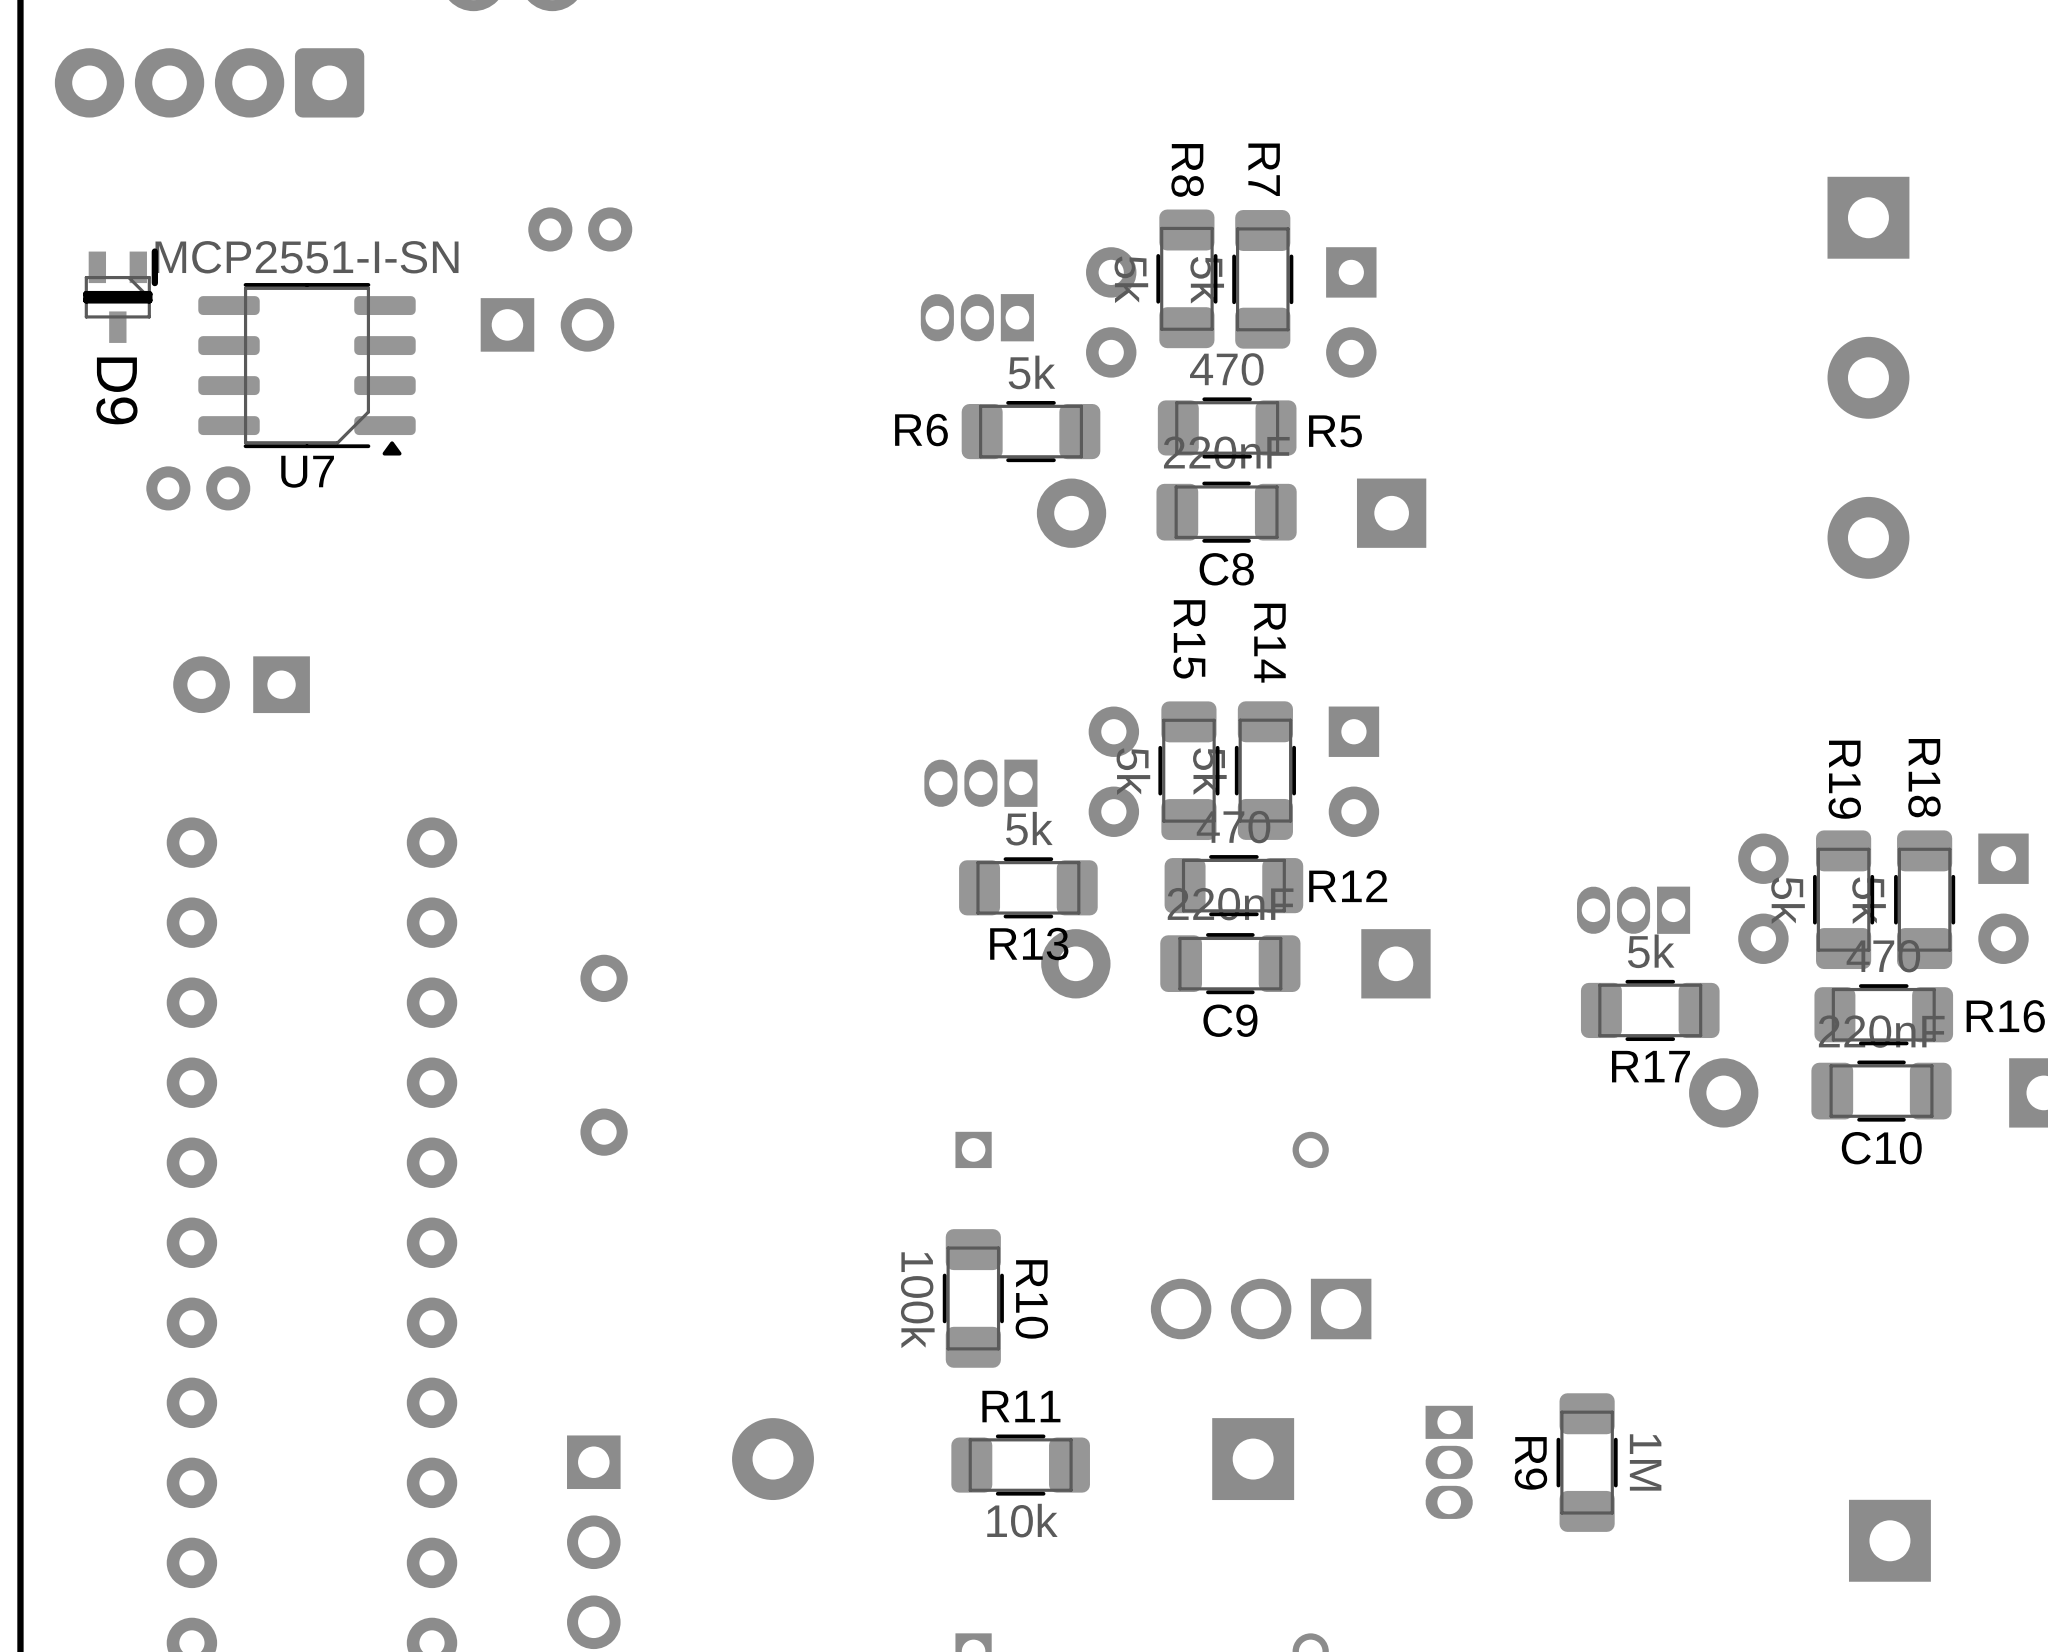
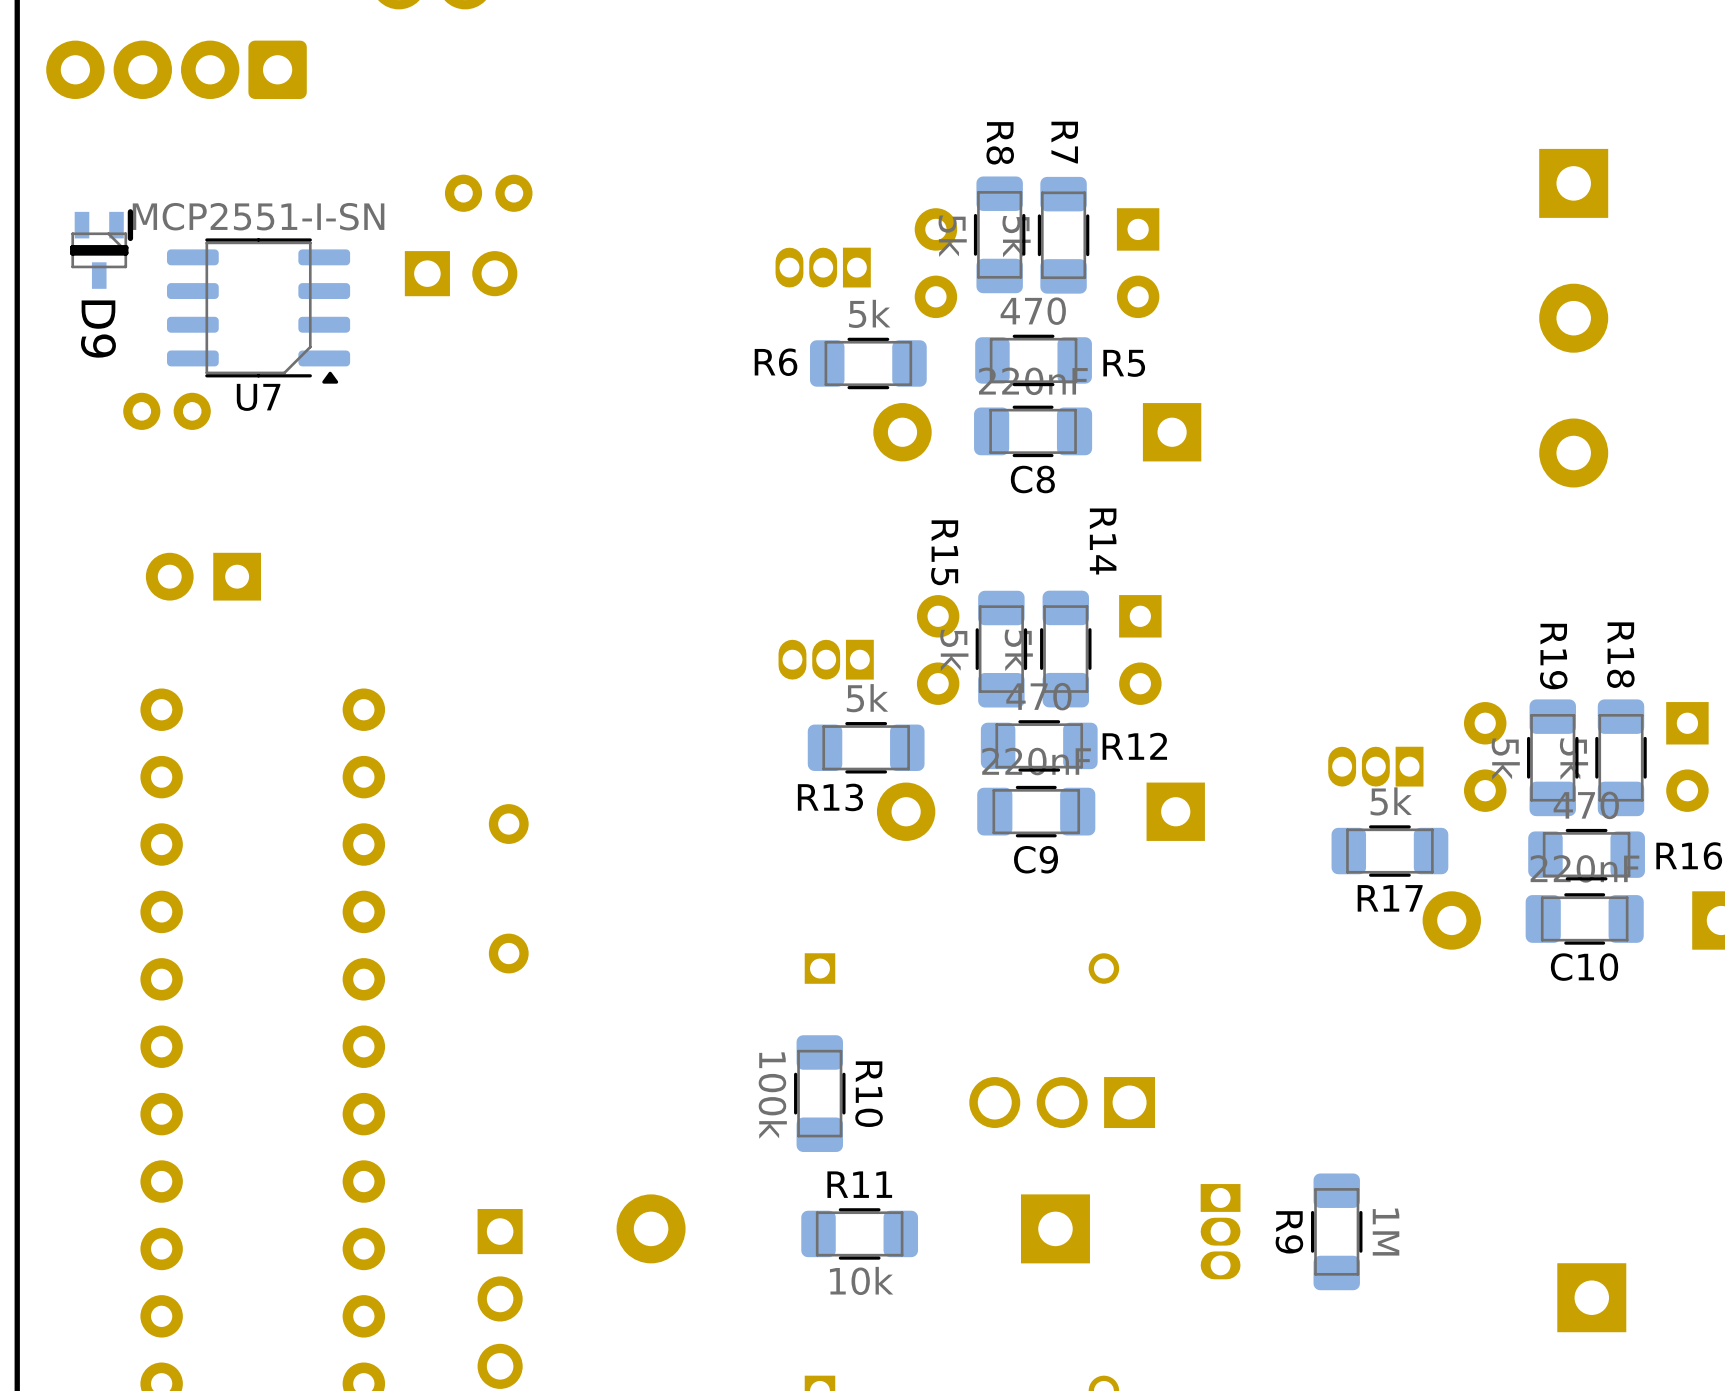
R15 name position: R15 (1189, 639) -> R15 (944, 552)
R14 name position: R14 (1269, 643) -> R14 (1103, 541)
R13 name position: R13 (1029, 943) -> R13 (830, 797)

